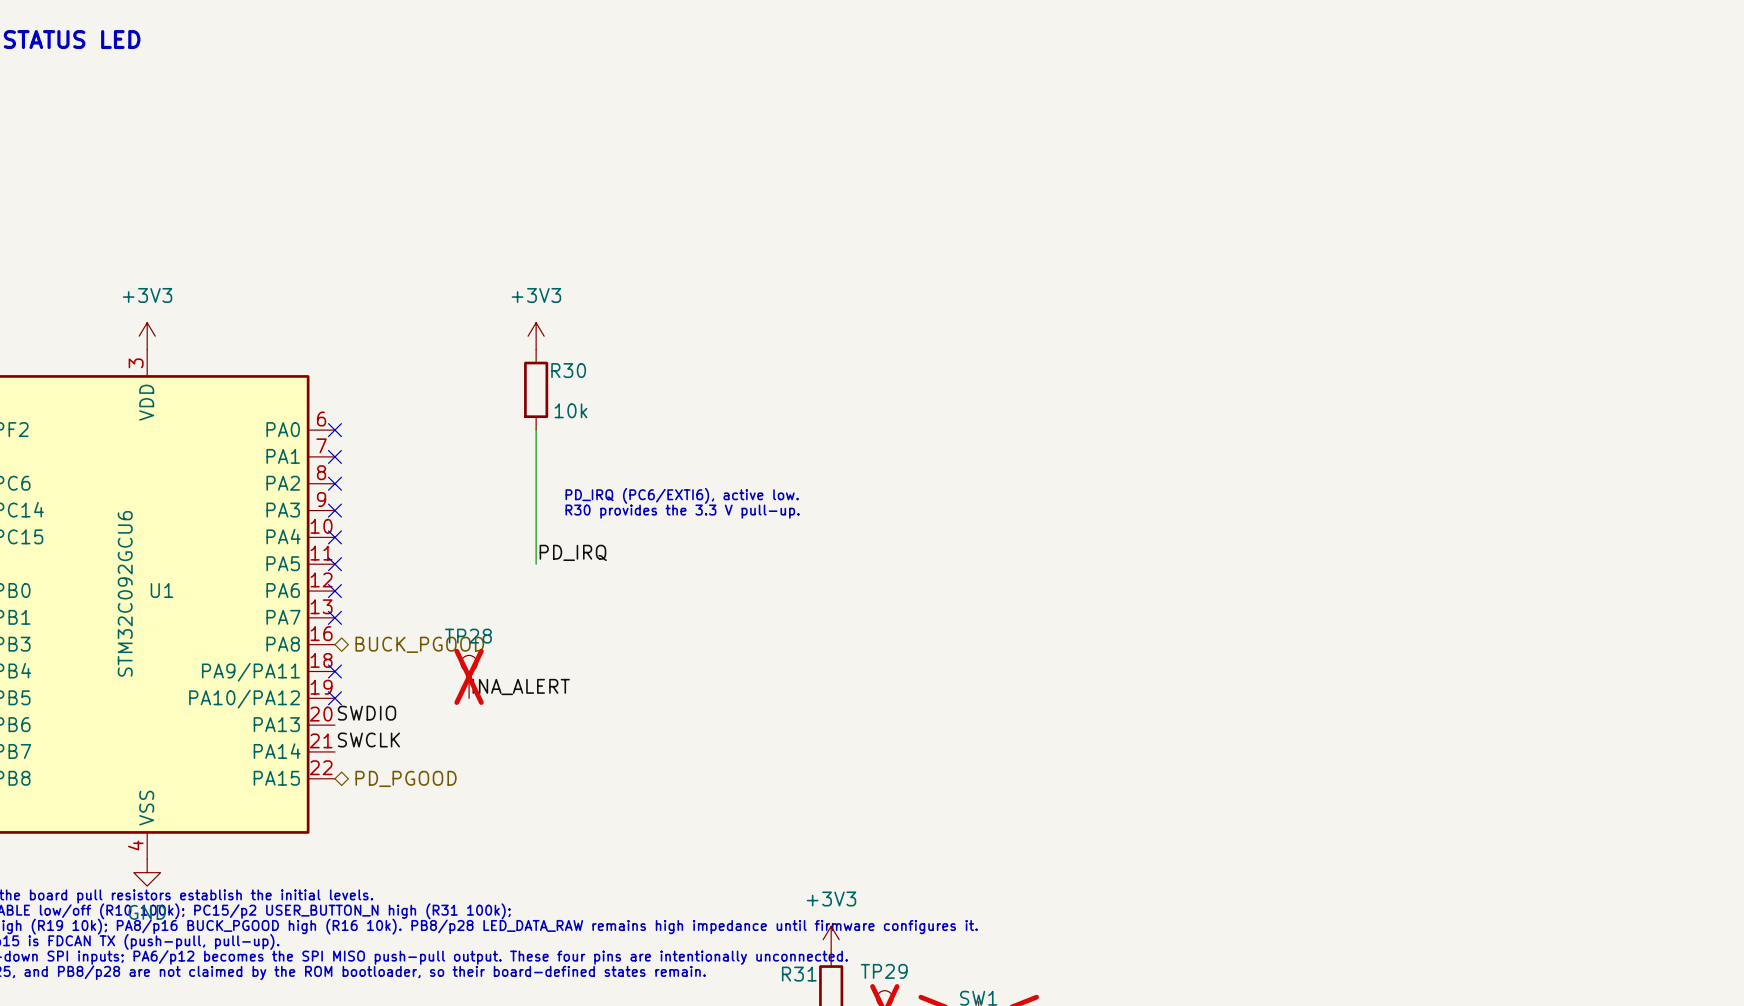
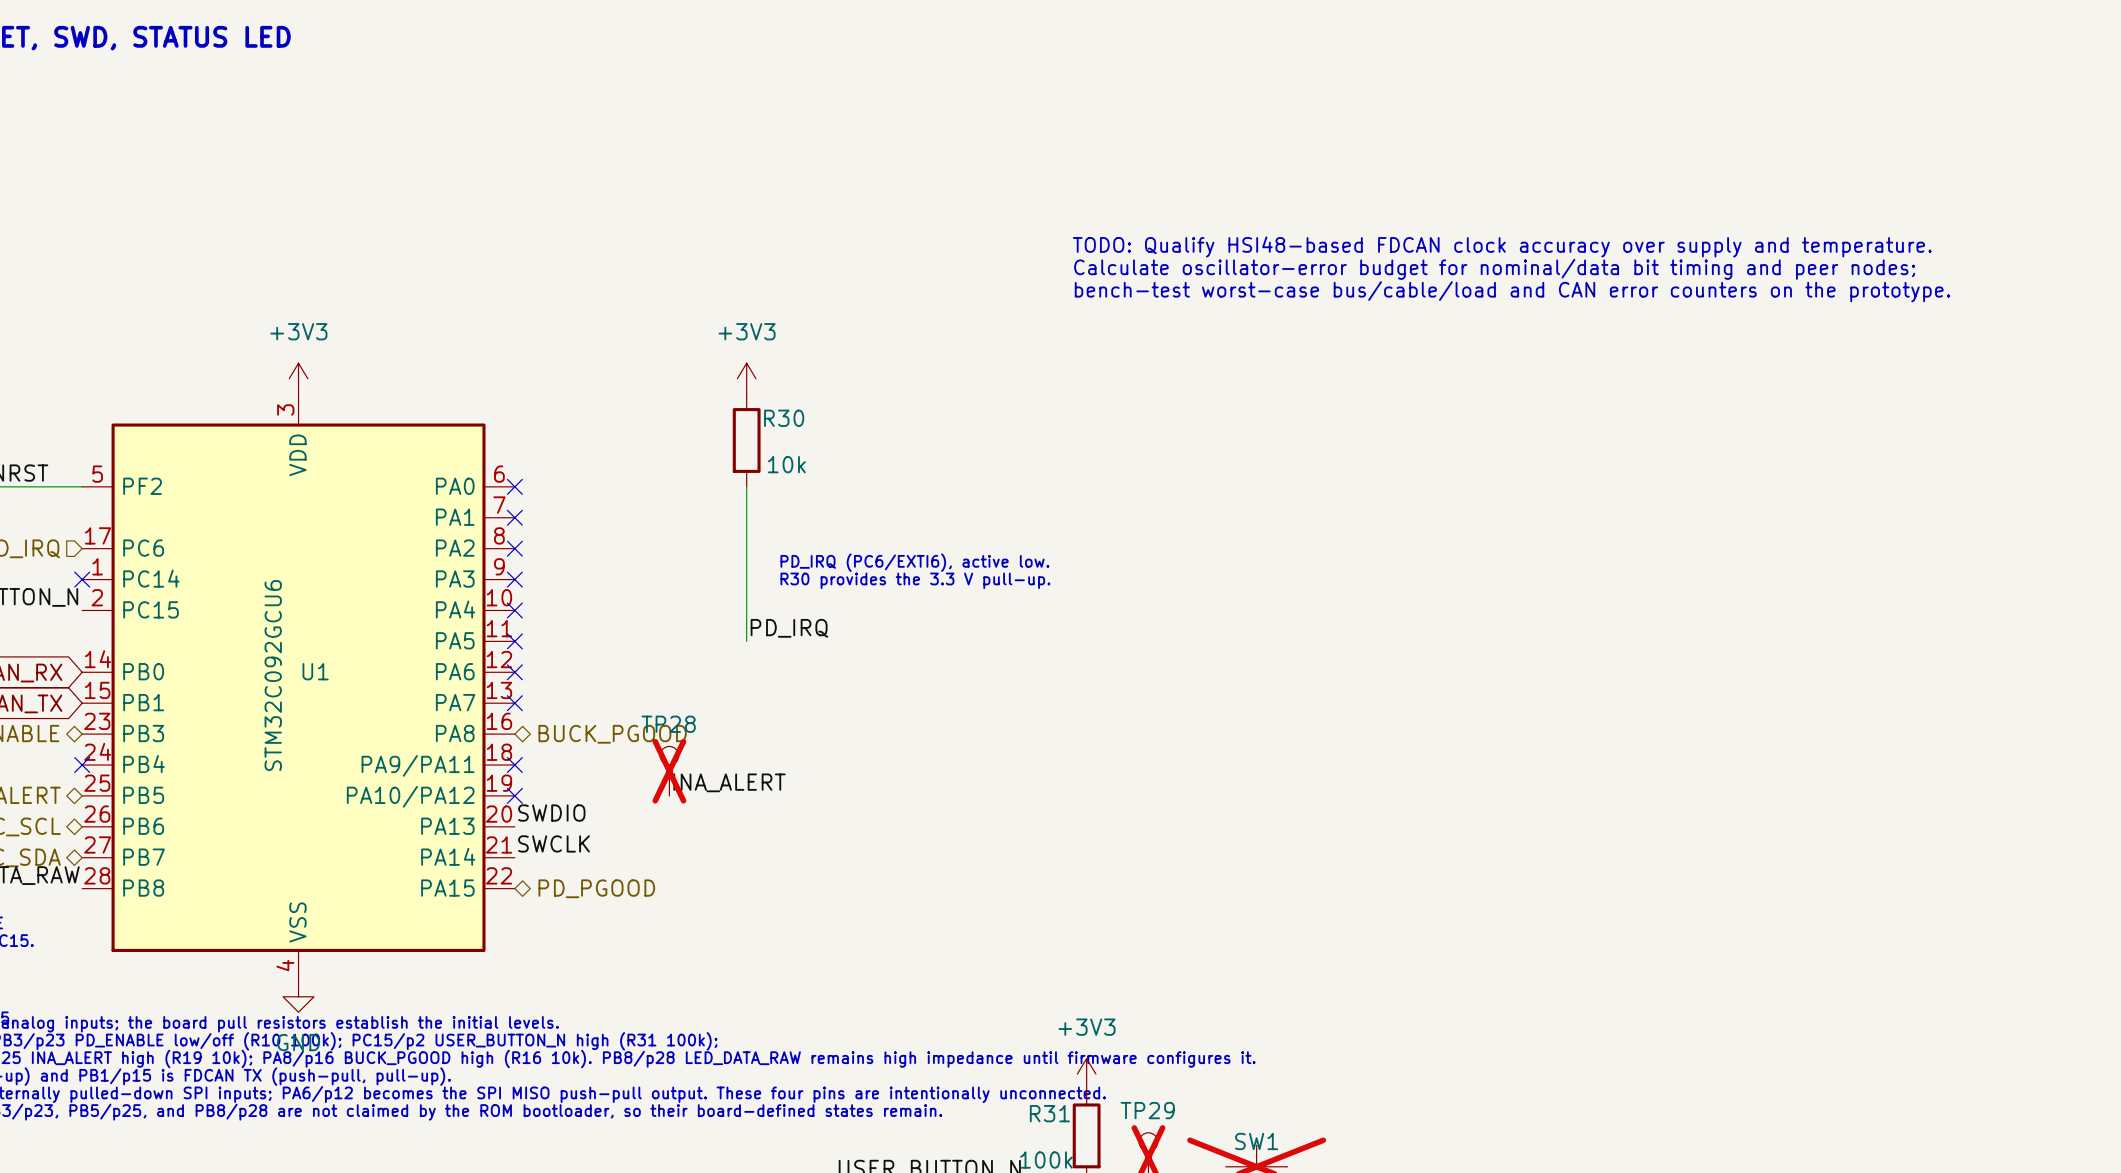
text: none -> TODO: Qualify HSI48-based FDCAN clock accuracy over supply and temperature. (1502, 246)
text: none -> Calculate oscillator-error budget for nominal/data bit timing and peer nodes; (1494, 269)
text: none -> bench-test worst-case bus/cable/load and CAN error counters on the prototype. (1512, 291)

